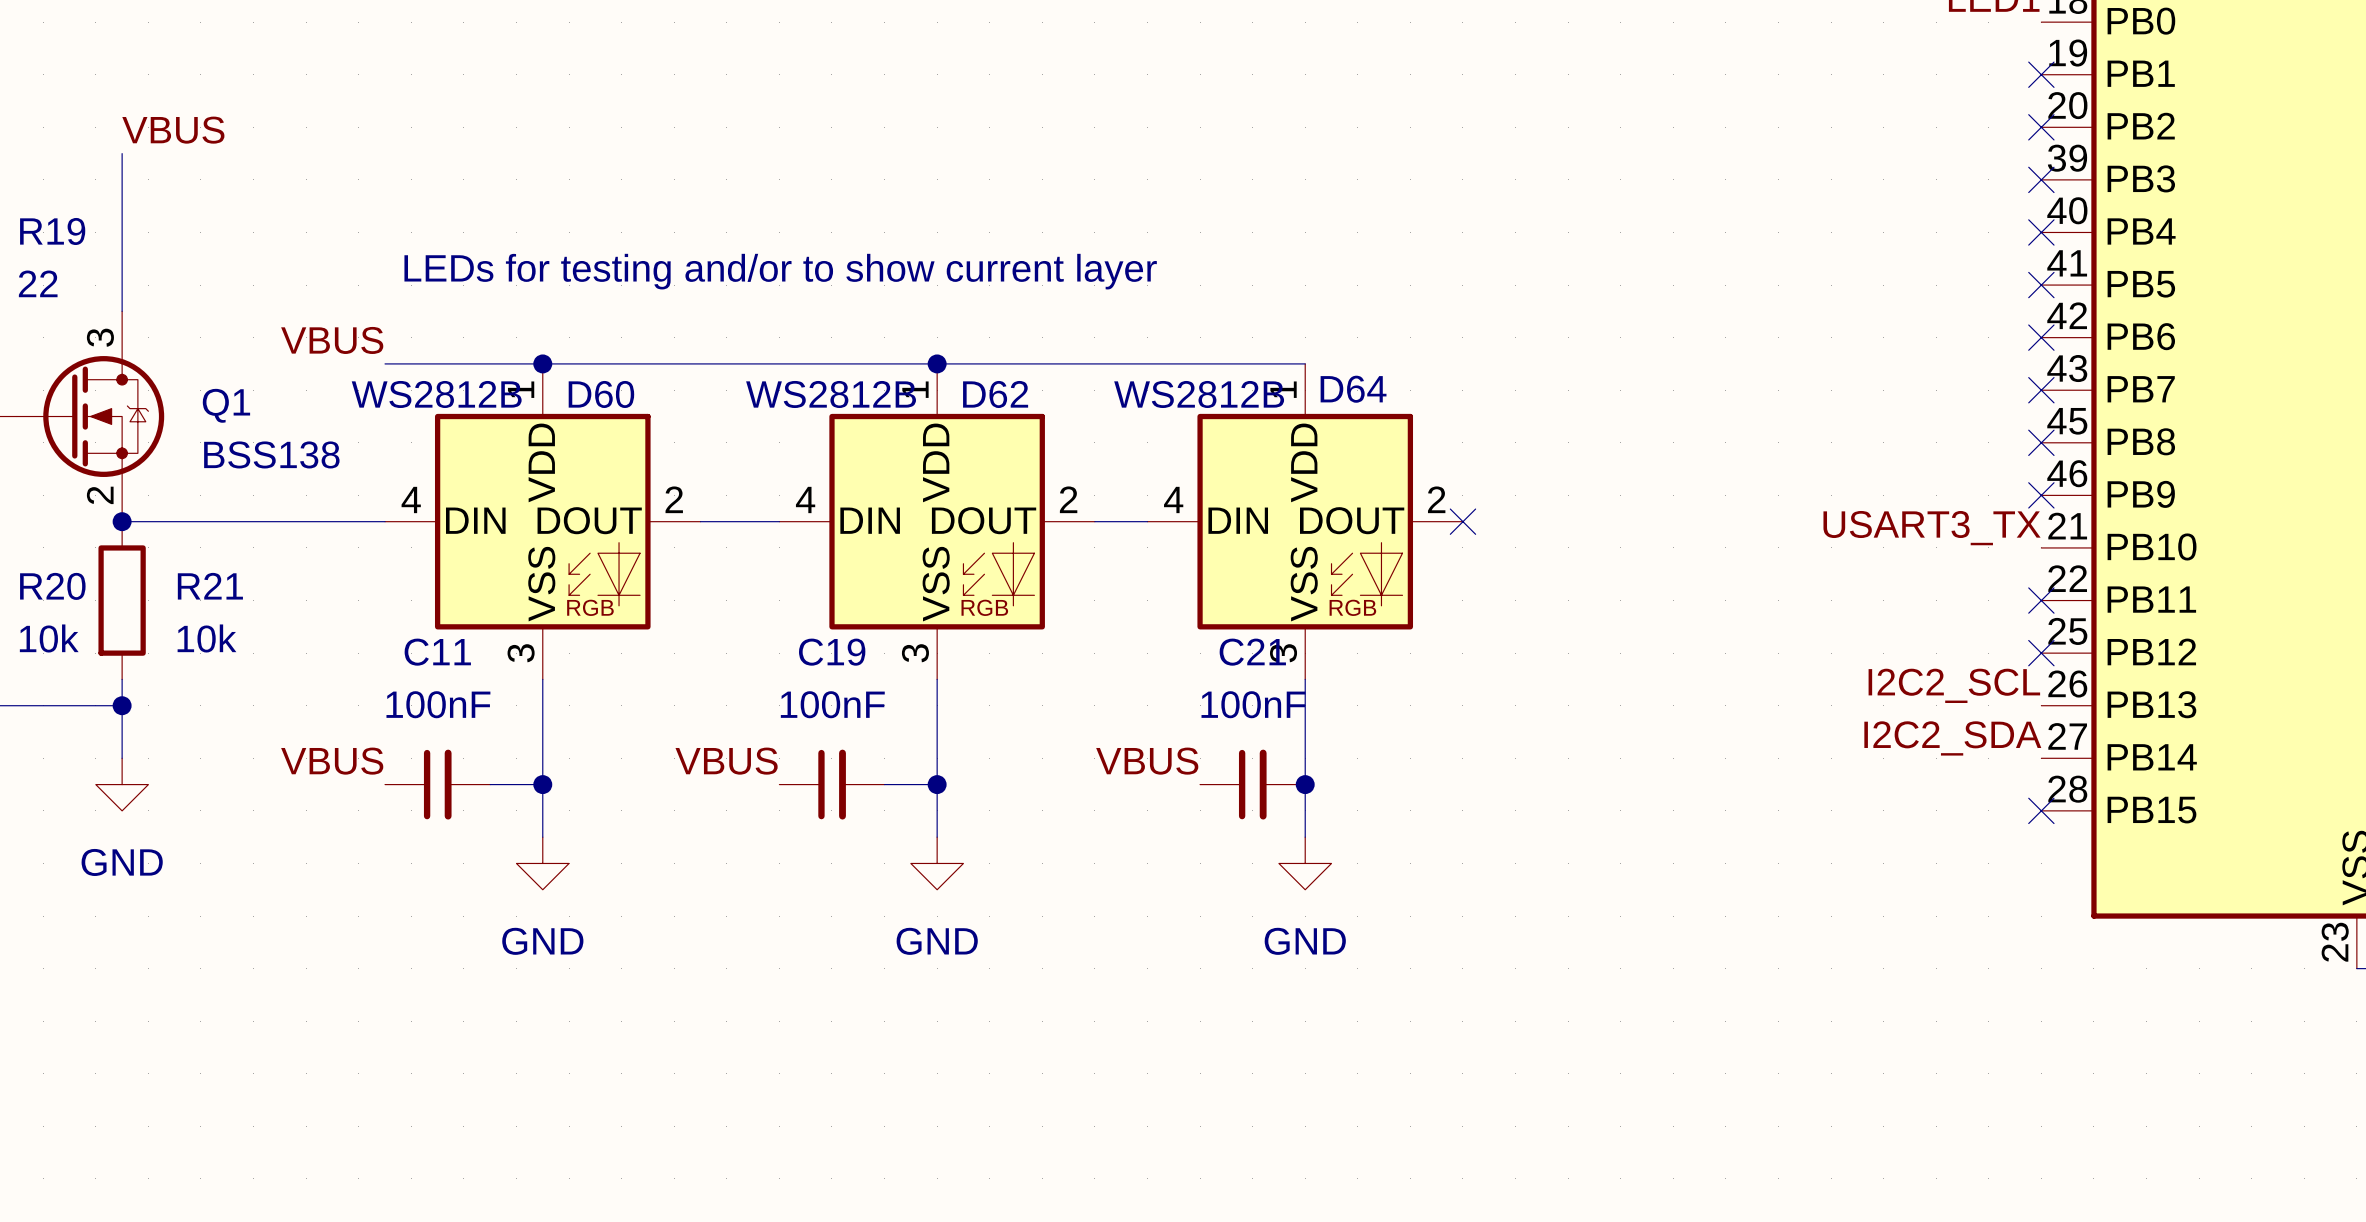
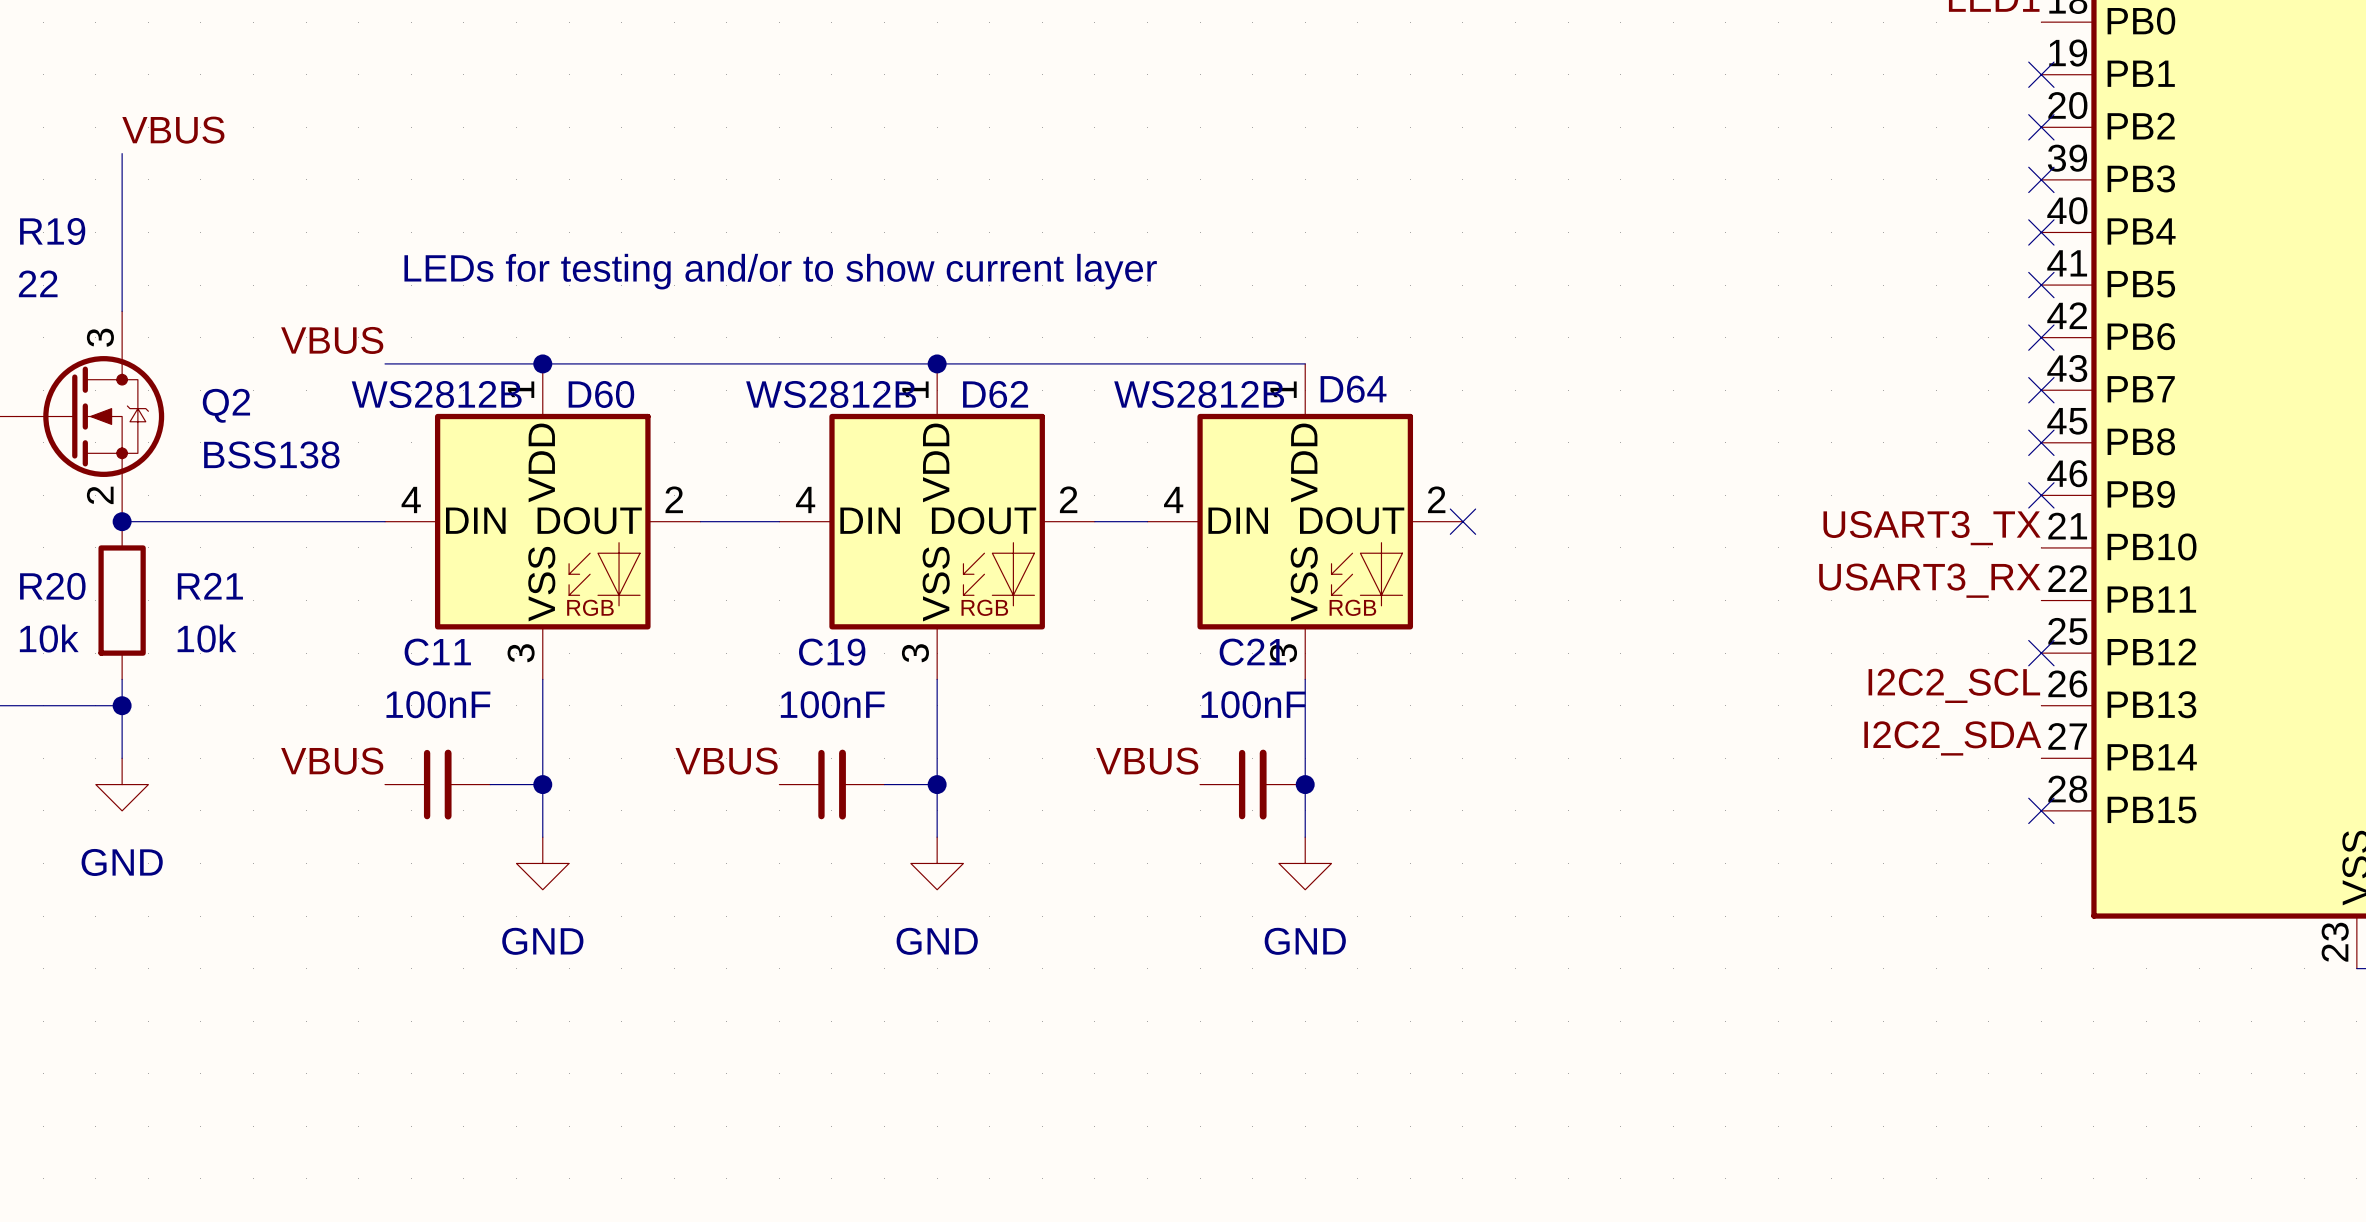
Q1 name: Q1 (226, 405) -> Q2 (226, 405)
label: none -> USART3_RX (1929, 580)
no-connect mark: (2041, 600) -> none

